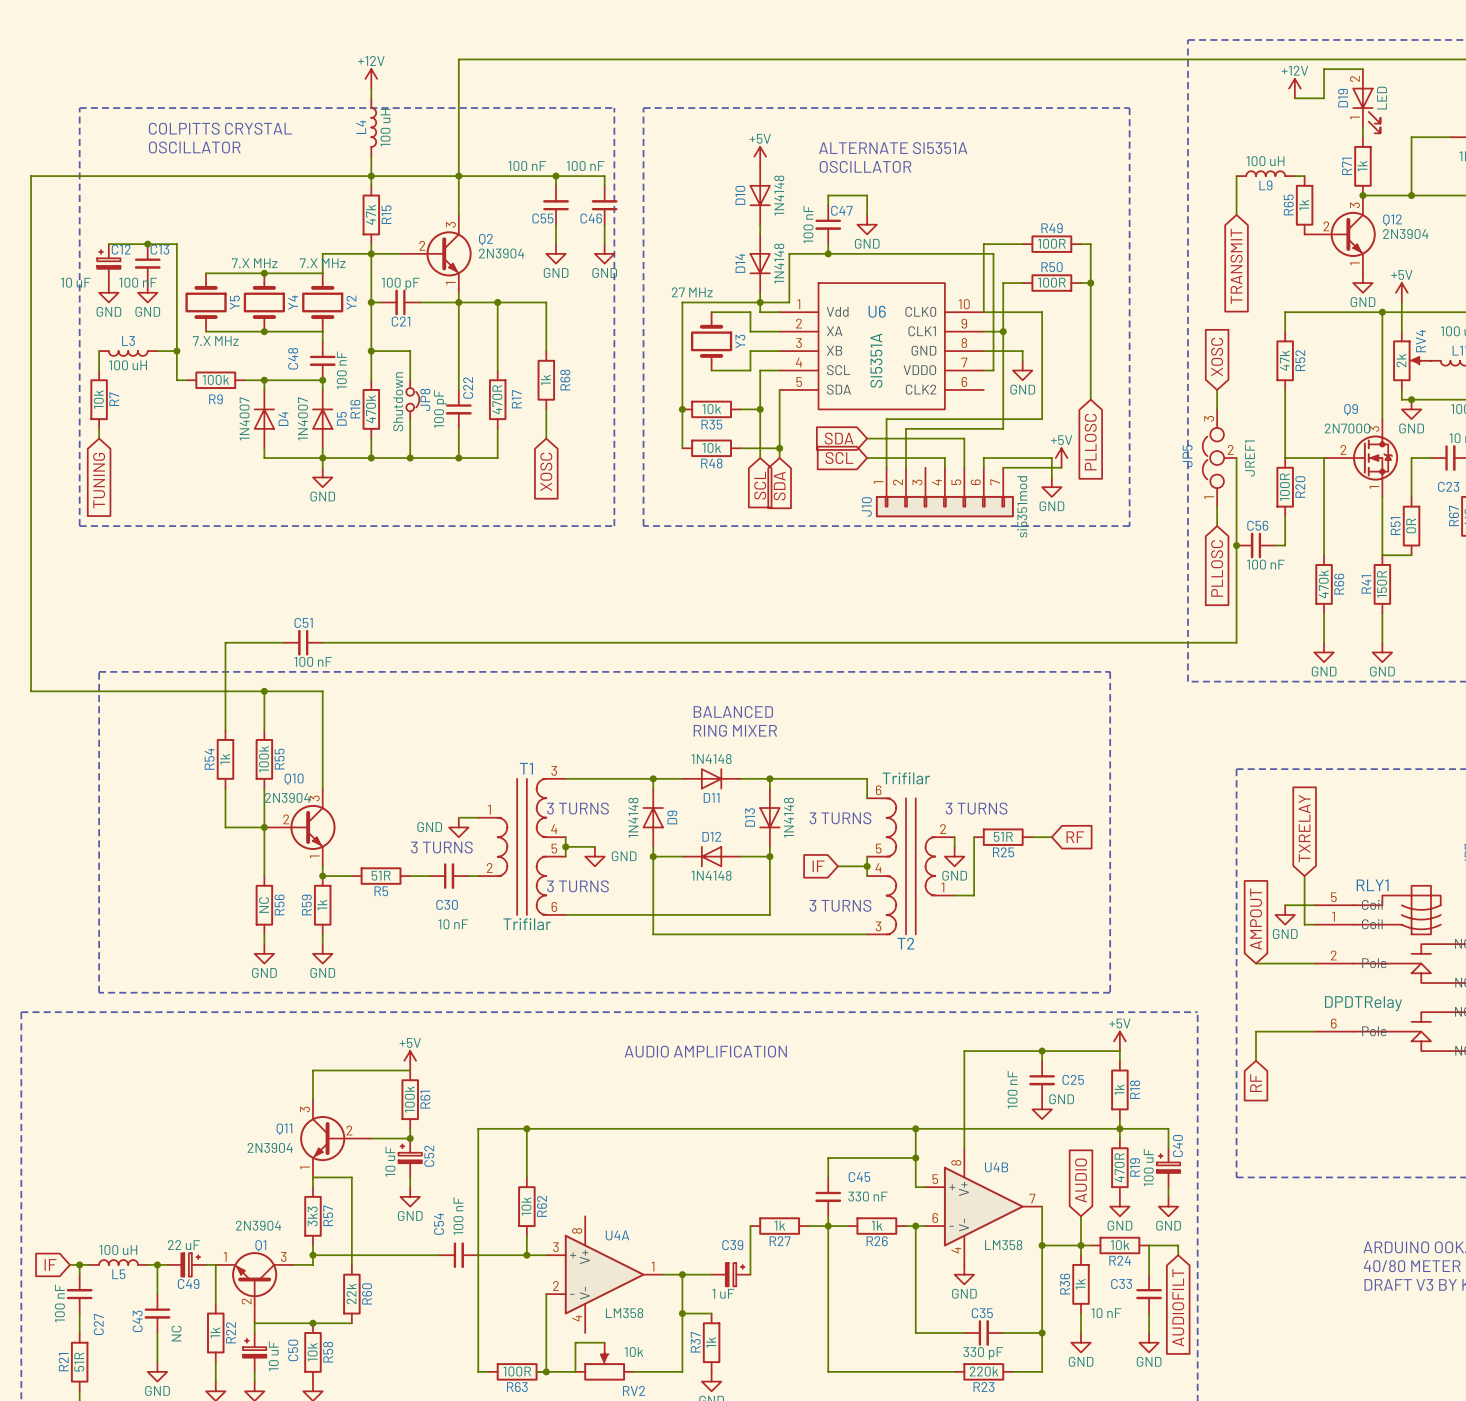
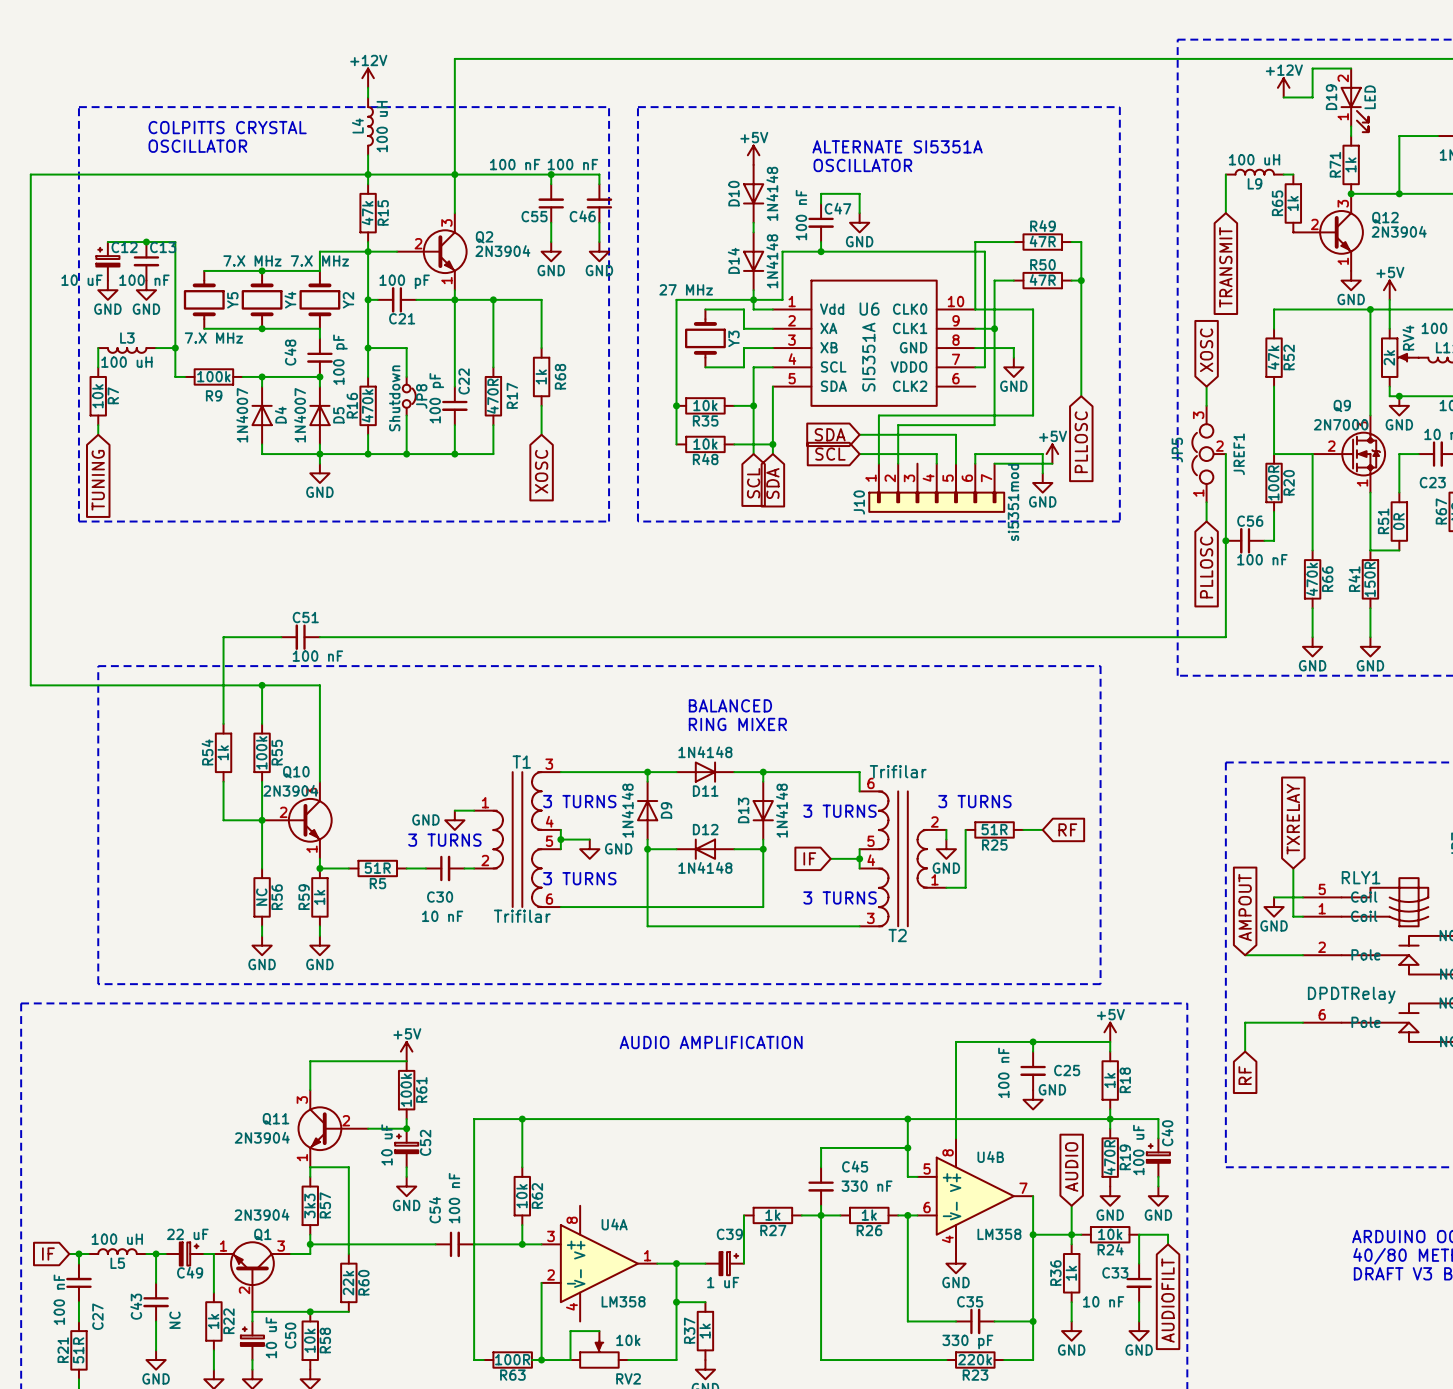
R49 value: 100R (1051, 243) -> 47R (1042, 241)
R50 value: 100R (1051, 282) -> 47R (1042, 279)
C48 value: 100 nF (341, 370) -> 100 pF (340, 359)

